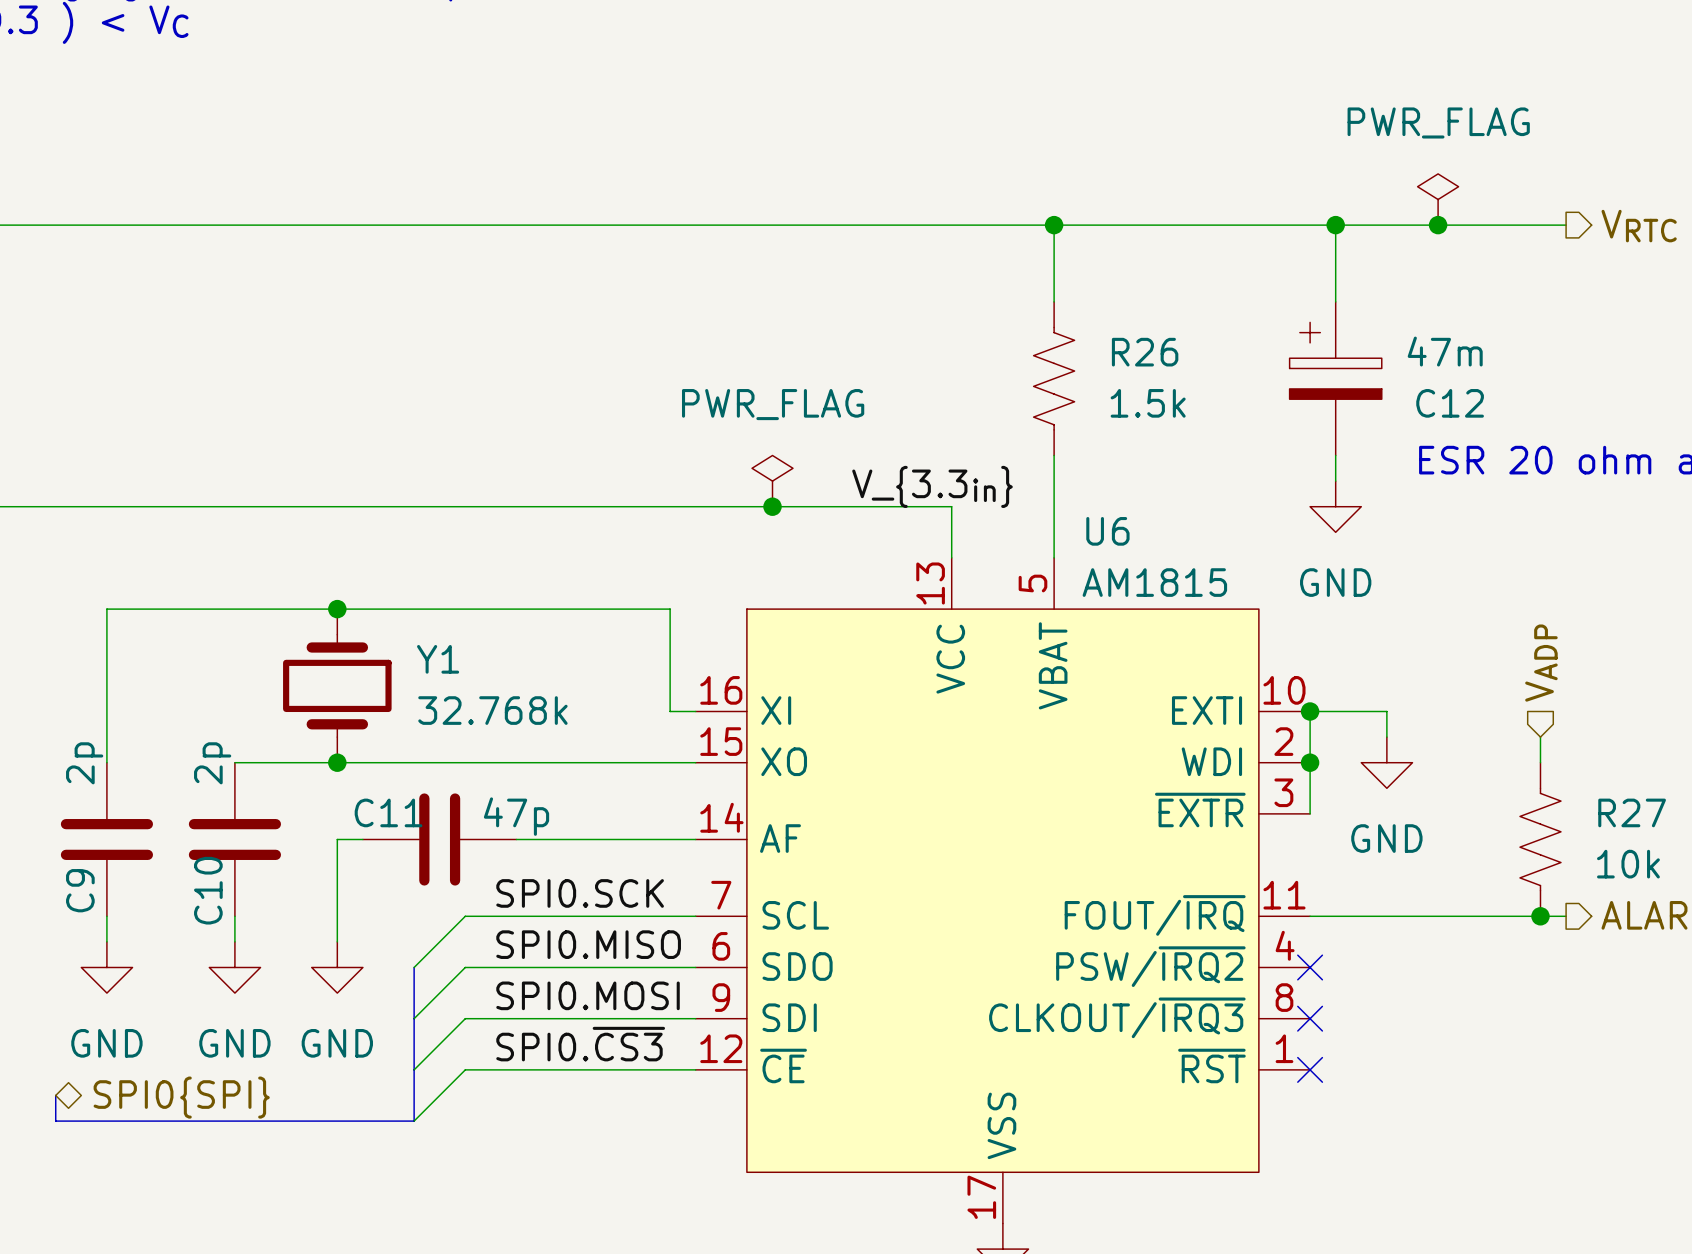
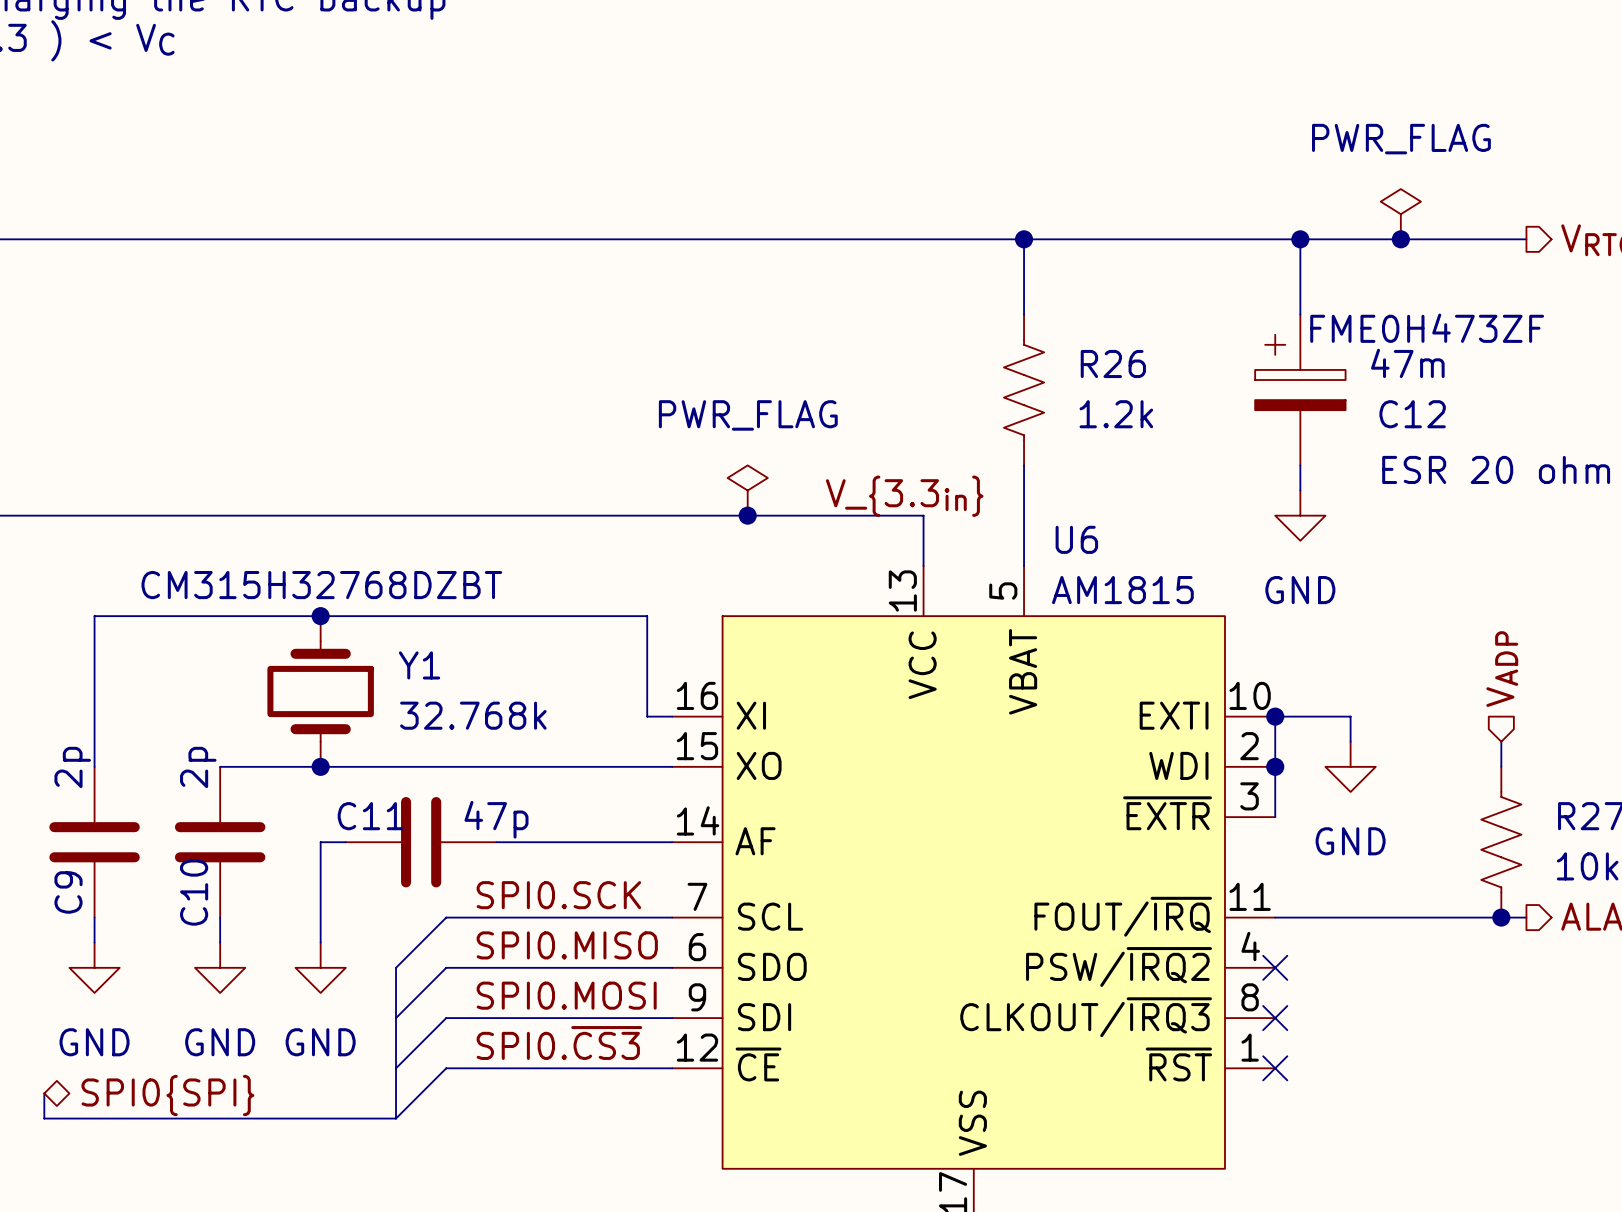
C12 text: none -> FME0H473ZF (1427, 328)
R26 value: 1.5k (1148, 403) -> 1.2k (1116, 414)
Y1 text: none -> CM315H32768DZBT (321, 585)

